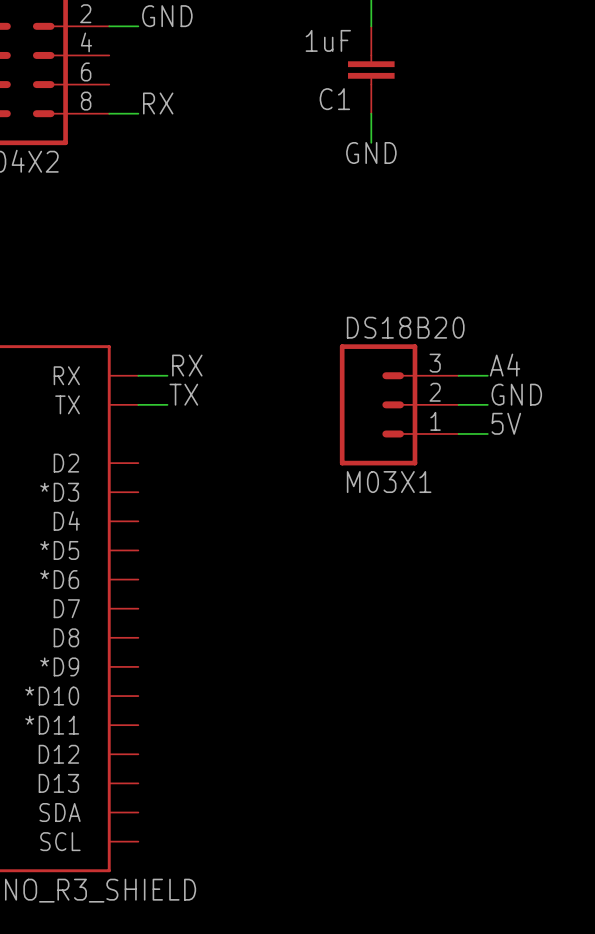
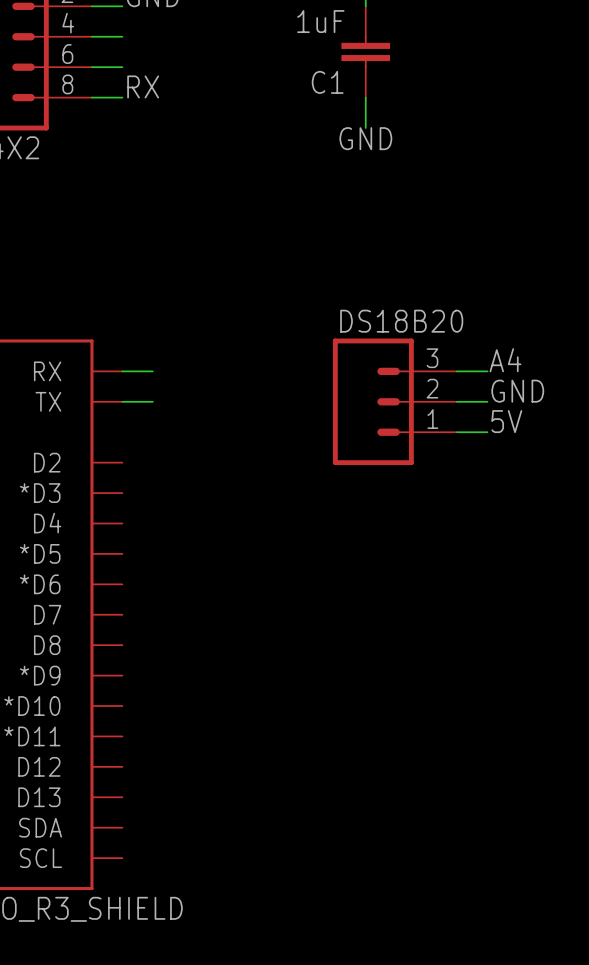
wire: none -> (91, 36) (122, 36)
wire: none -> (91, 67) (122, 67)
label: RX (187, 365) -> none
label: TX (183, 394) -> none
DS18B20 value: M03X1 (389, 482) -> none

